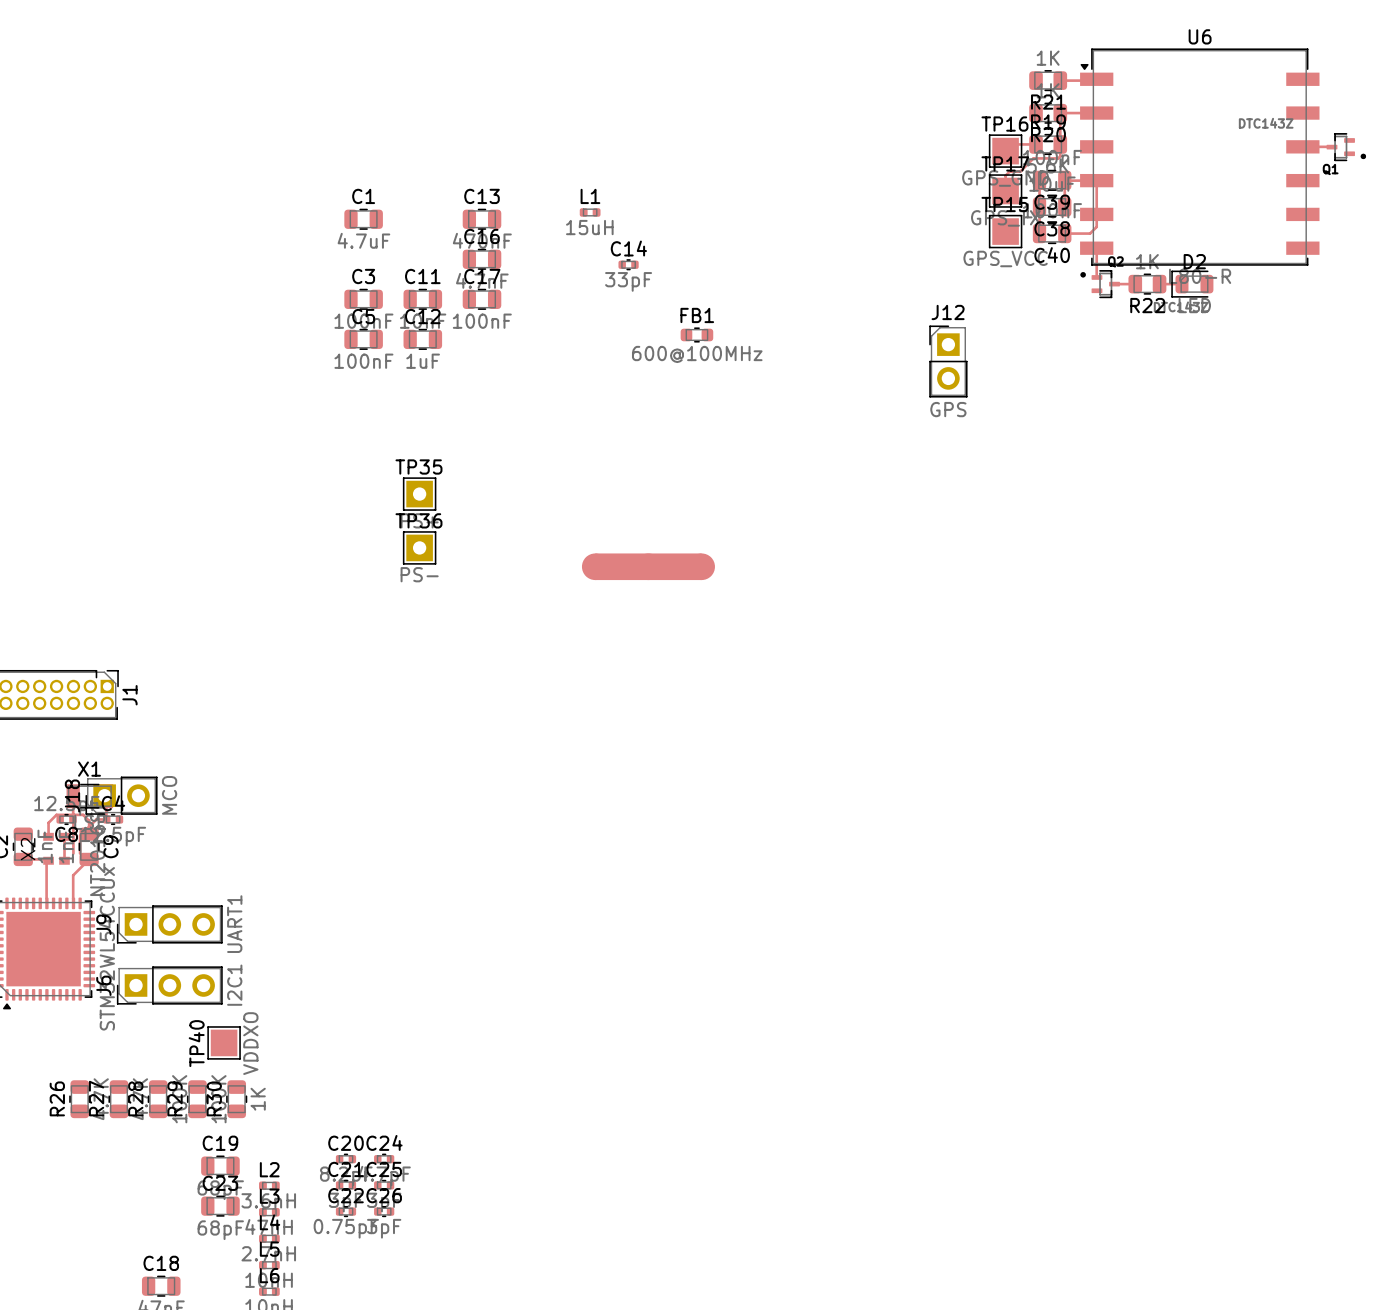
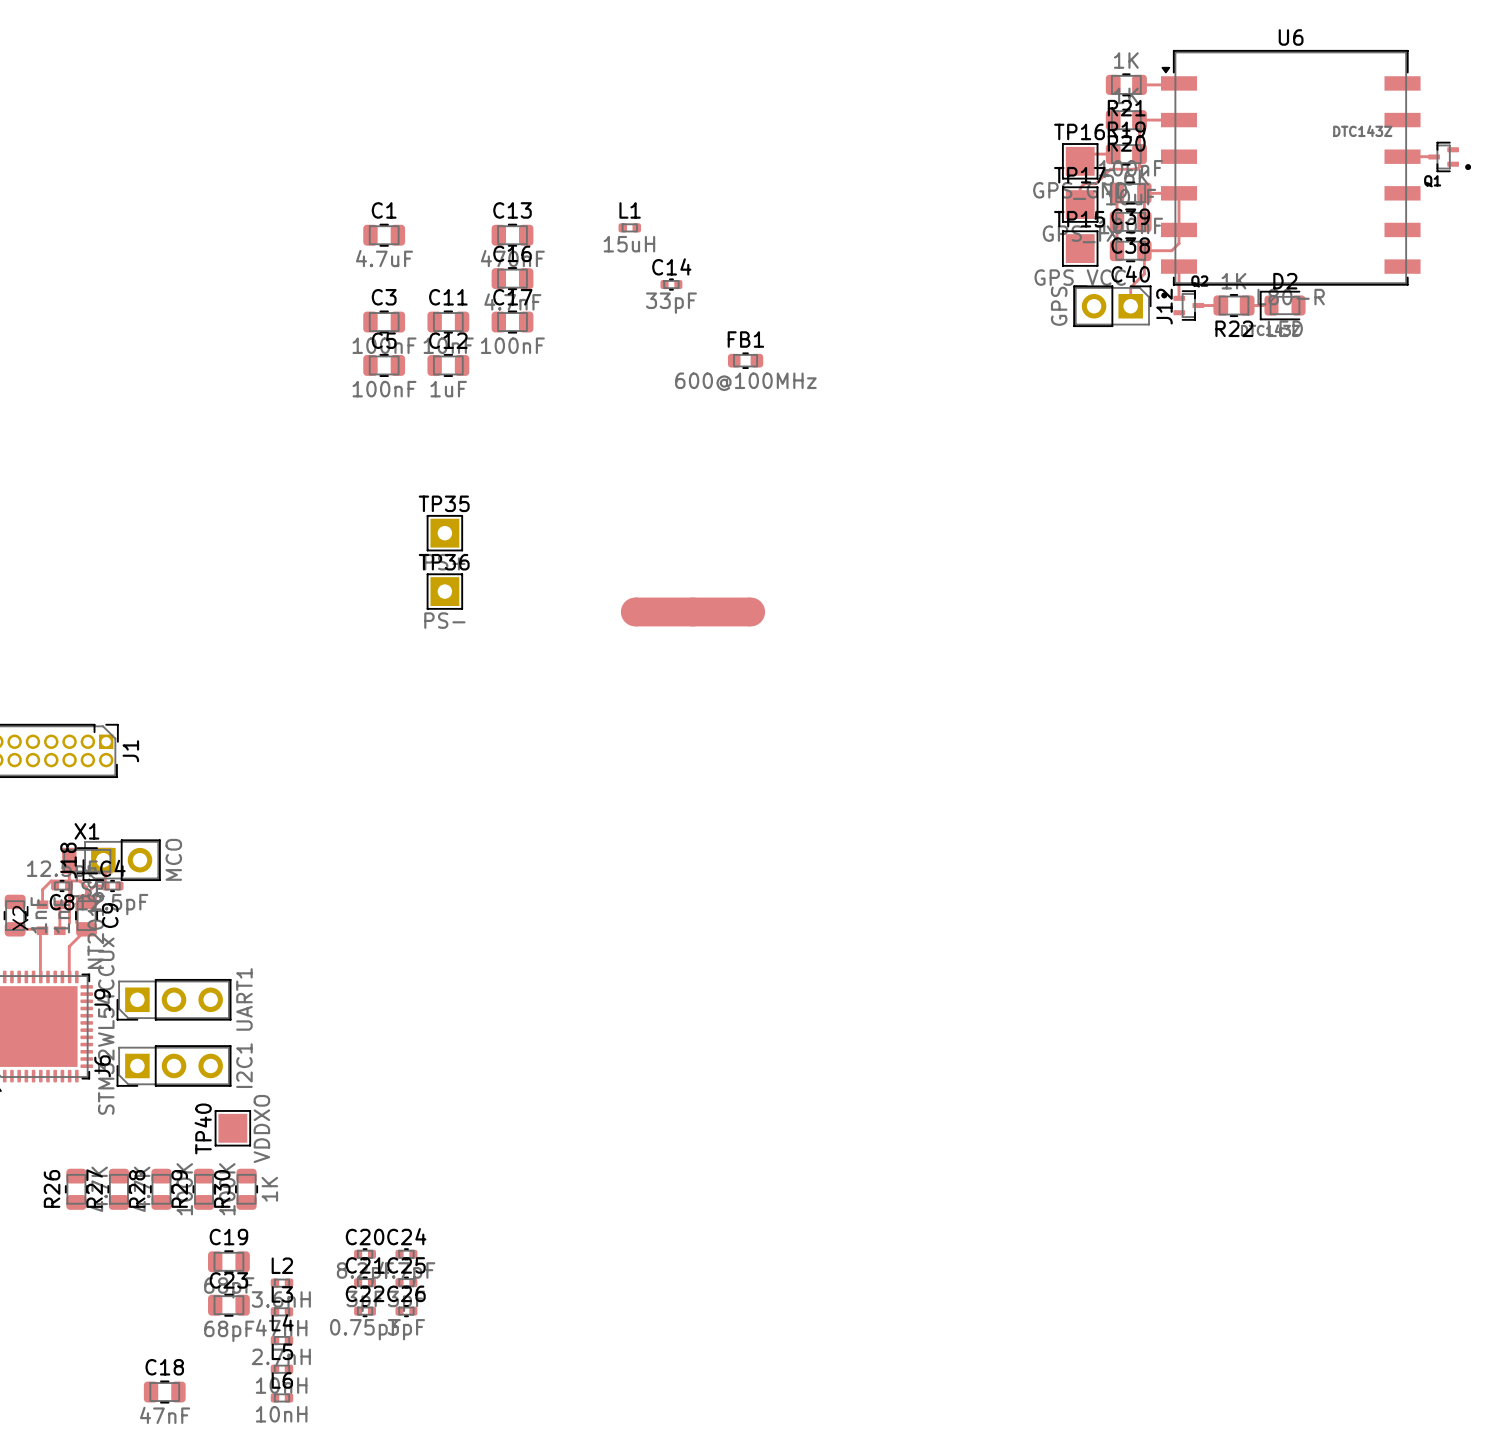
track: none -> (1144, 250) (1144, 273) (1130, 287) (1130, 306)
J12 rotation: 0° (948, 361) -> 90° clockwise (1112, 306)
J12 position: (948, 361) -> (1112, 306)

